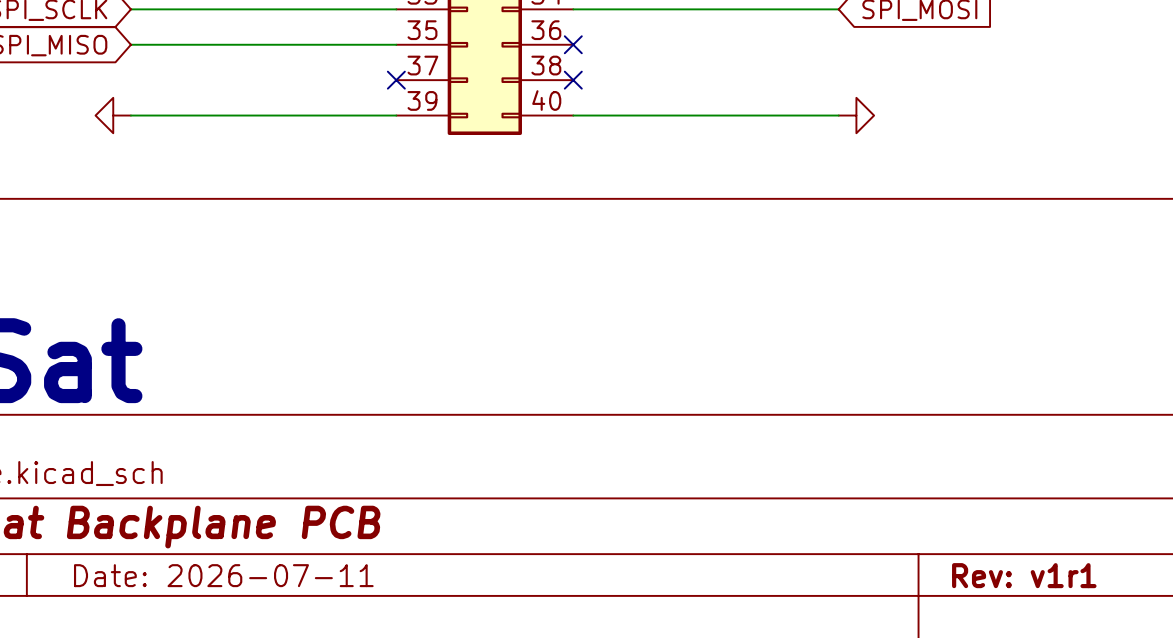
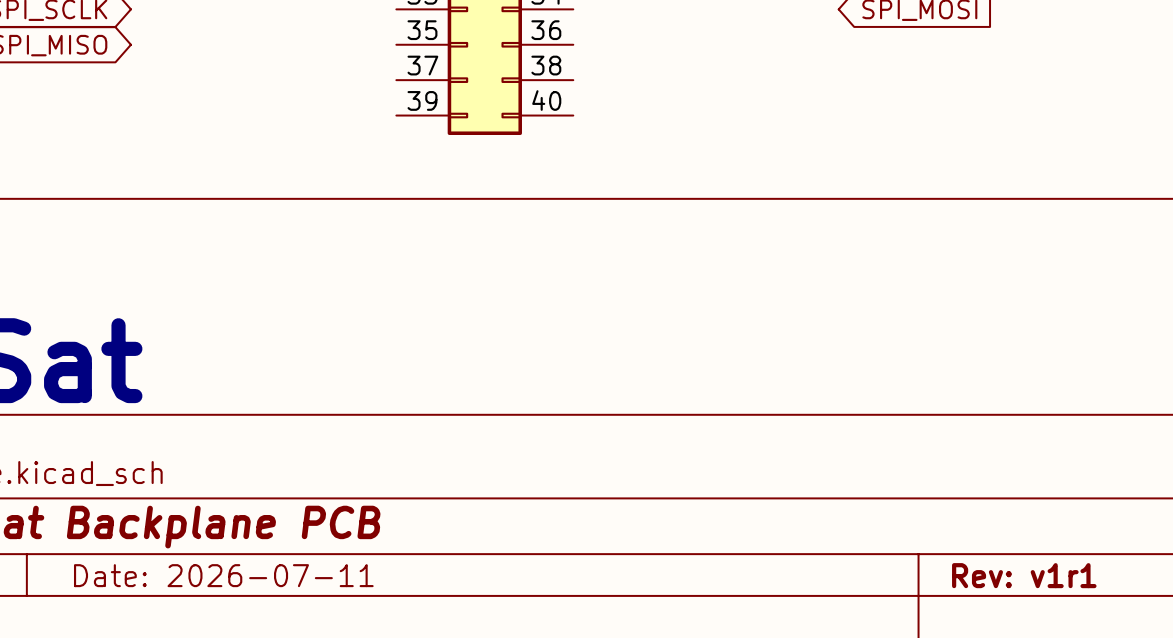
wire: (130, 9) (396, 9) -> none
wire: (573, 9) (838, 9) -> none
wire: (130, 44) (396, 44) -> none
no-connect mark: (573, 44) -> none
no-connect mark: (396, 80) -> none
no-connect mark: (573, 80) -> none
power symbol: (113, 115) -> none
wire: (130, 115) (396, 115) -> none
wire: (573, 115) (838, 115) -> none
power symbol: (856, 115) -> none

